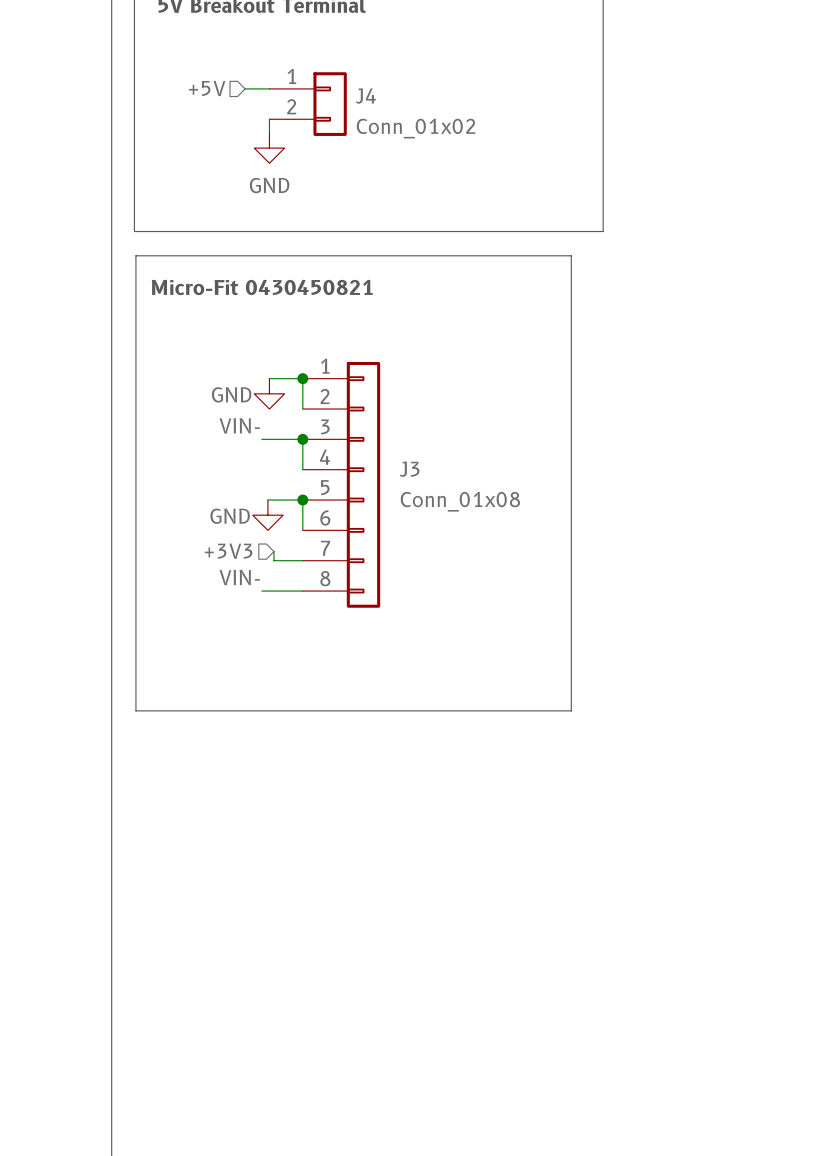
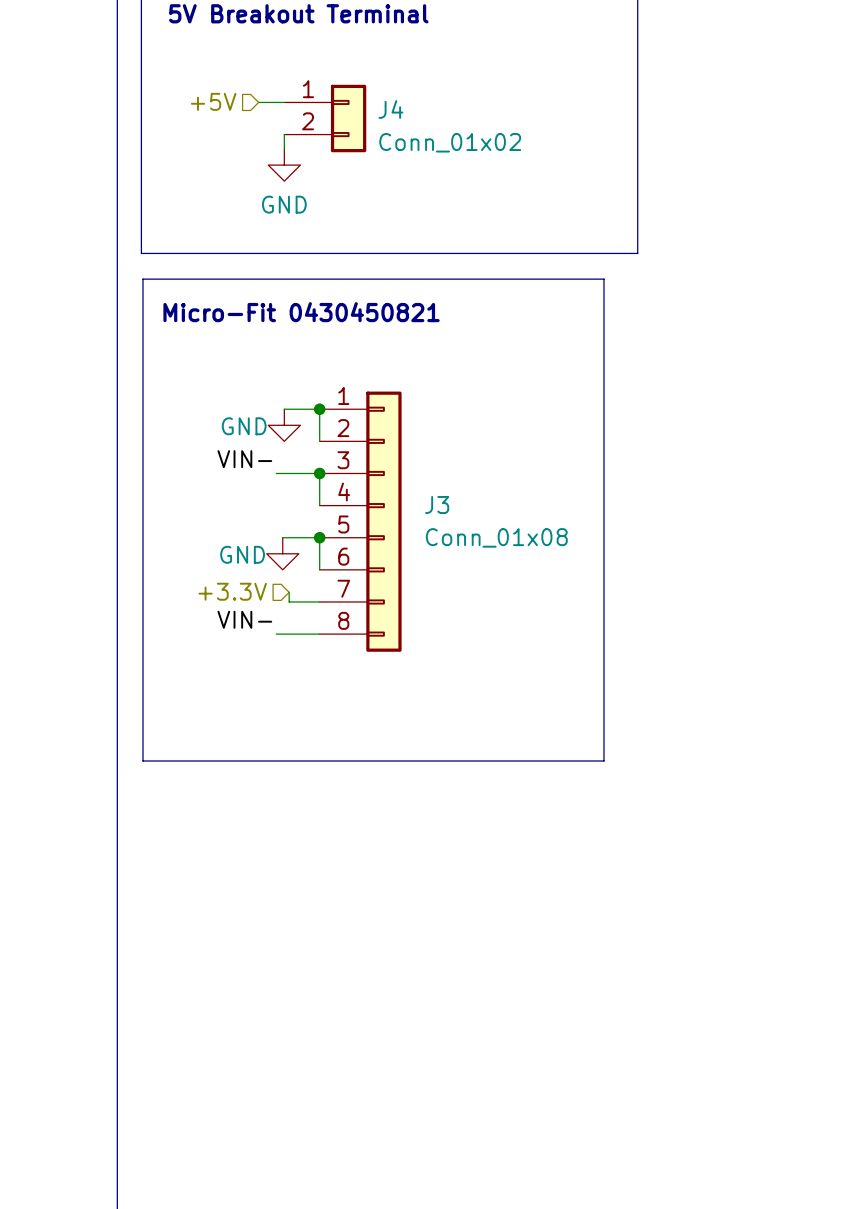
hierarchical label: +3V3 (228, 551) -> +3.3V (232, 591)

